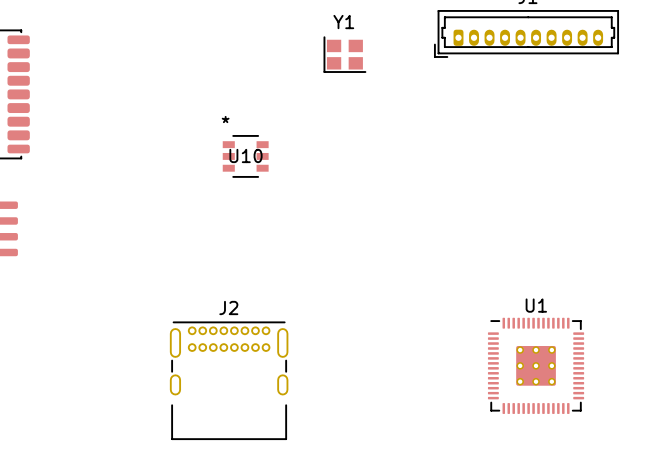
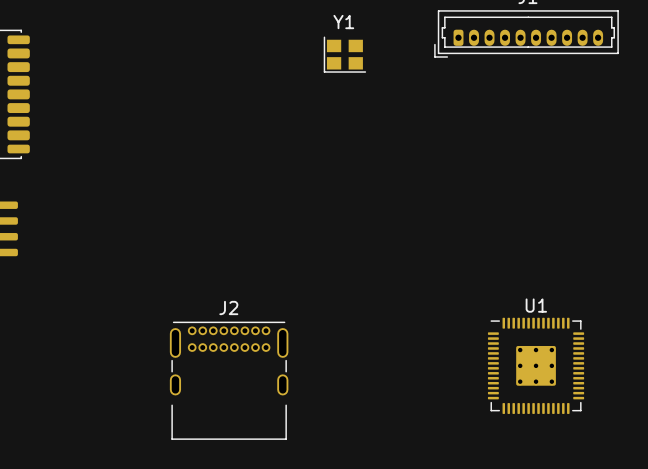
U10: (245, 156) -> none

